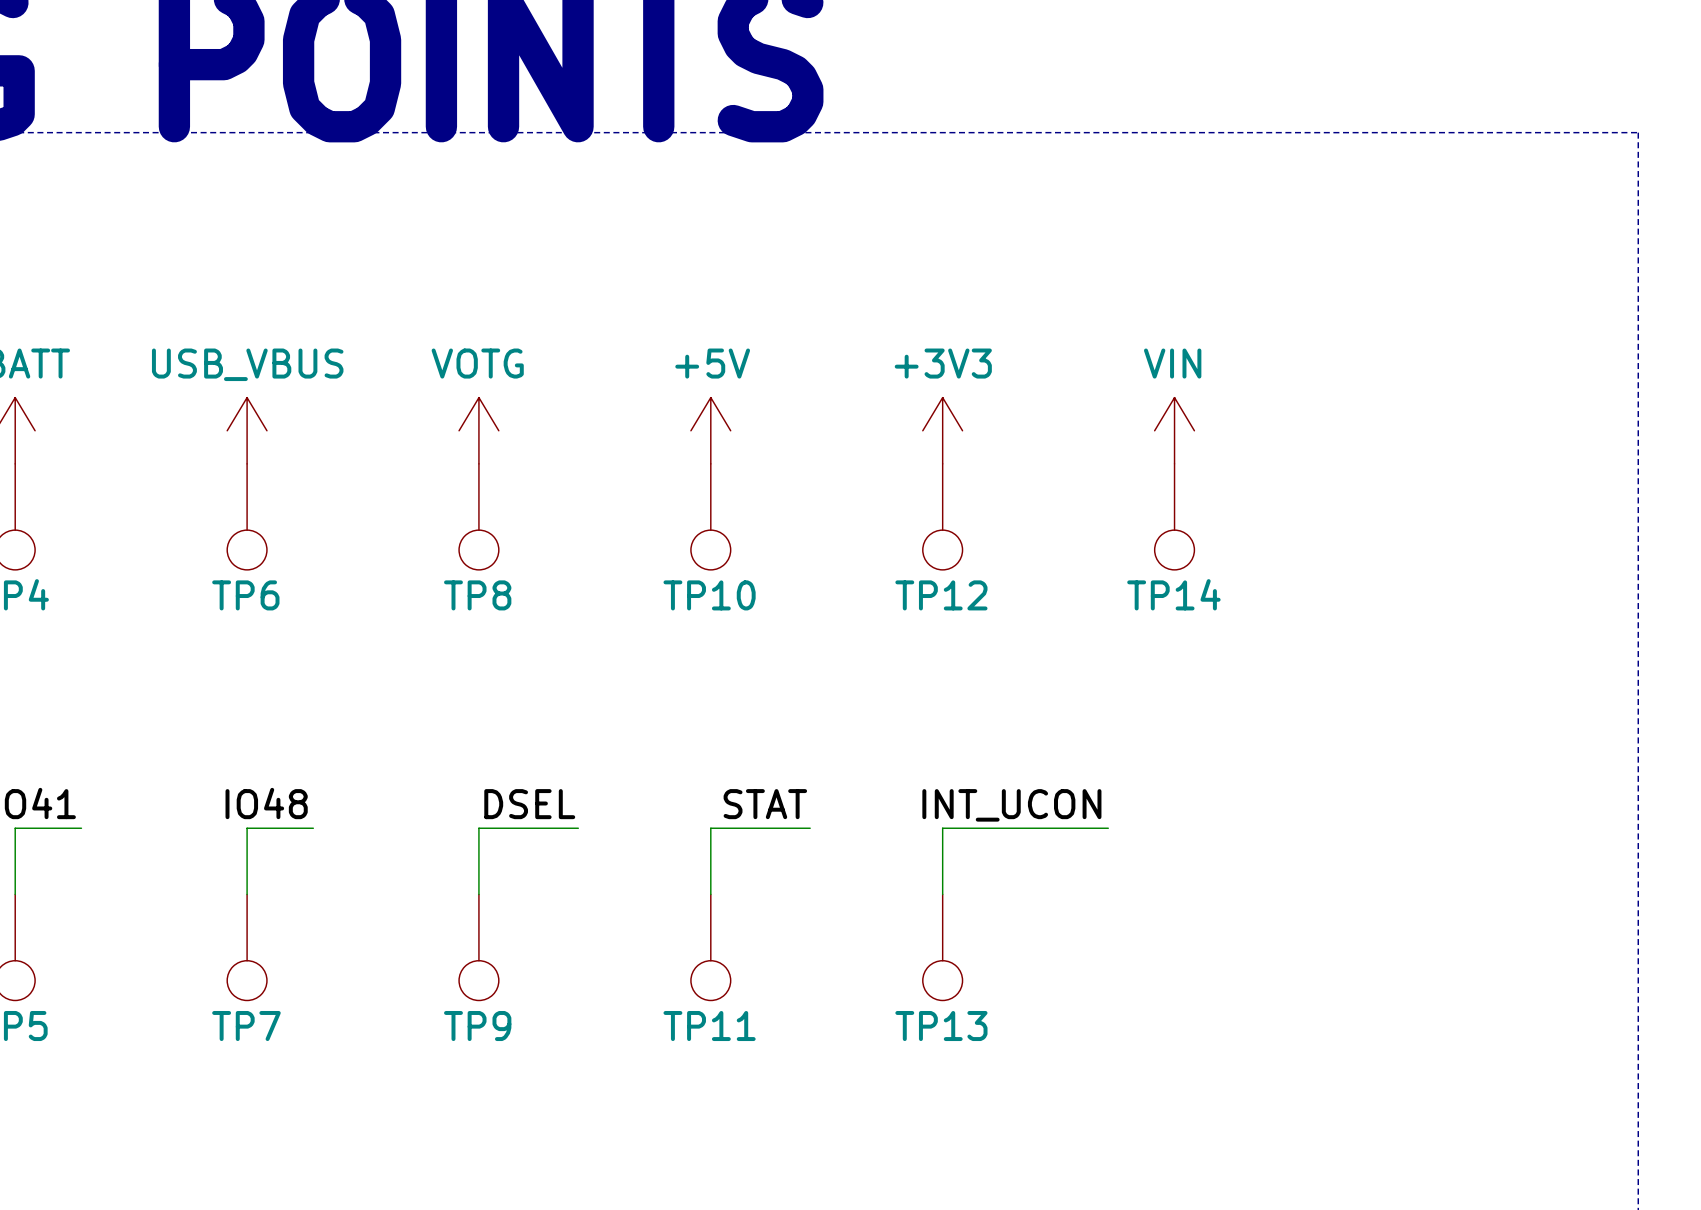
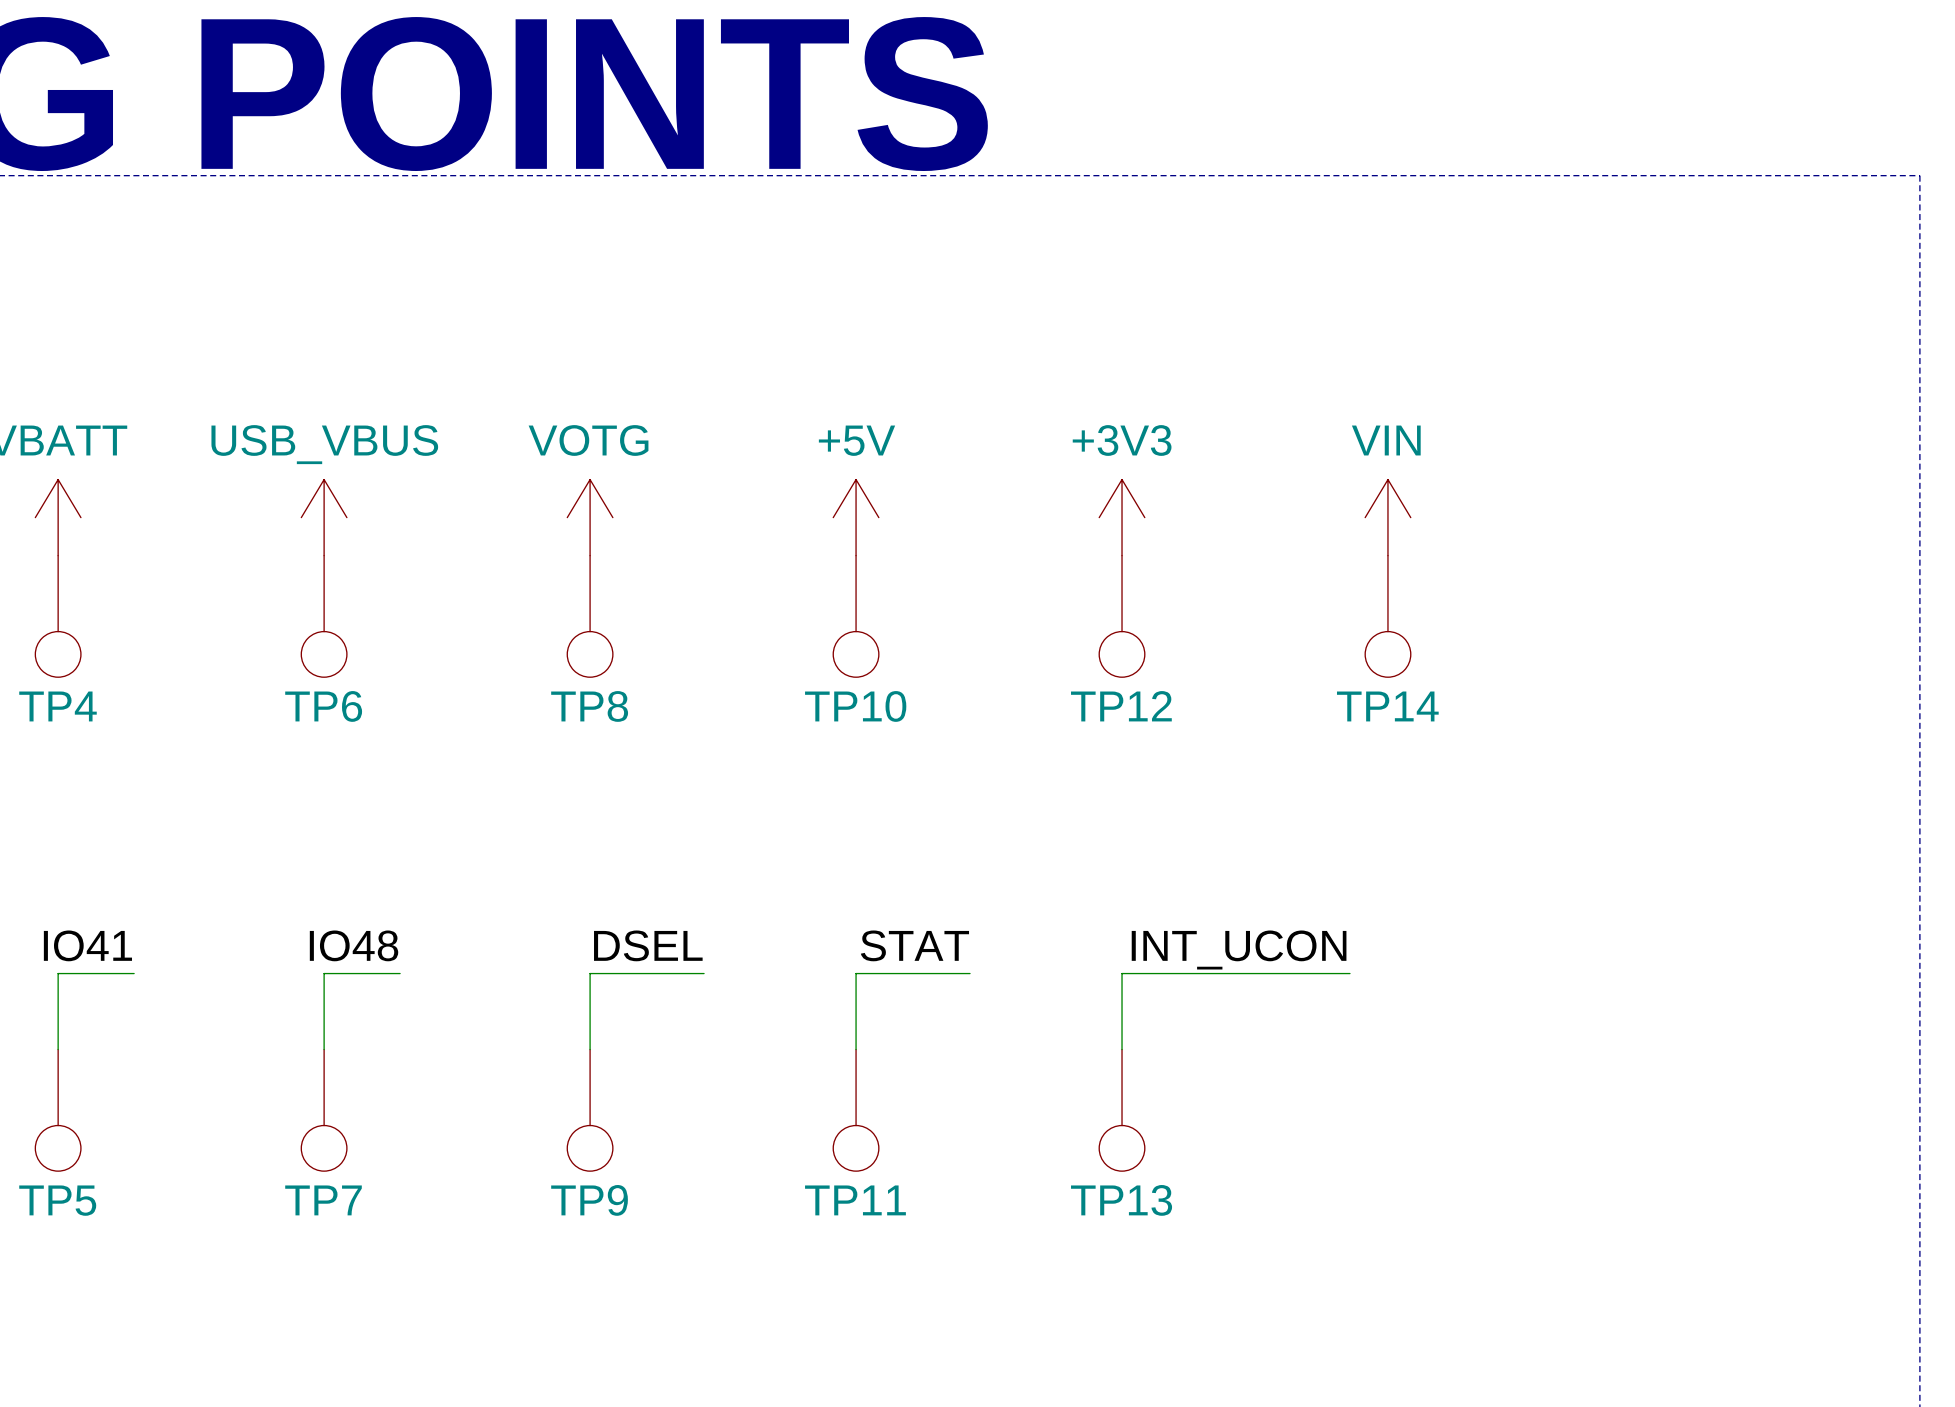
label position: INT_UCON (1011, 805) -> INT_UCON (1239, 949)
wire: none -> (1311, 973) (1349, 973)

